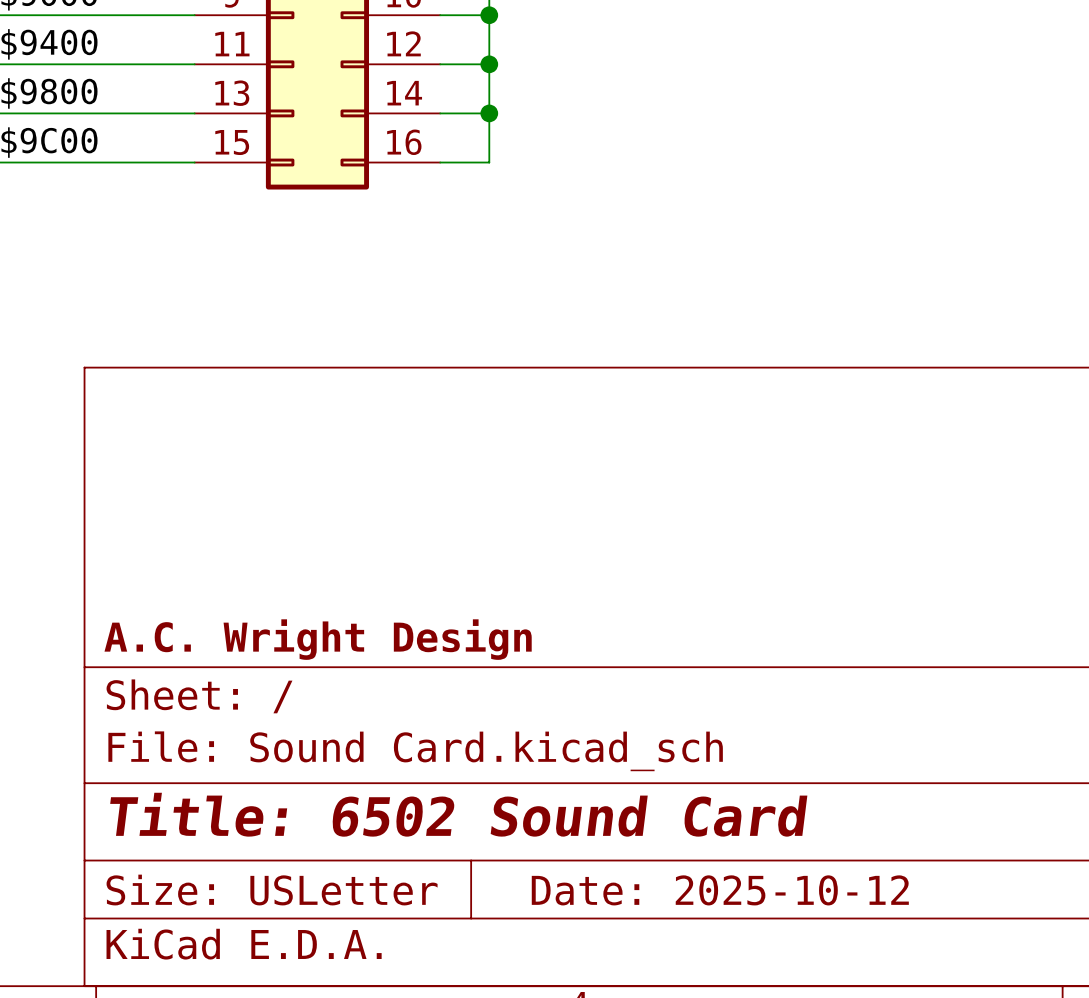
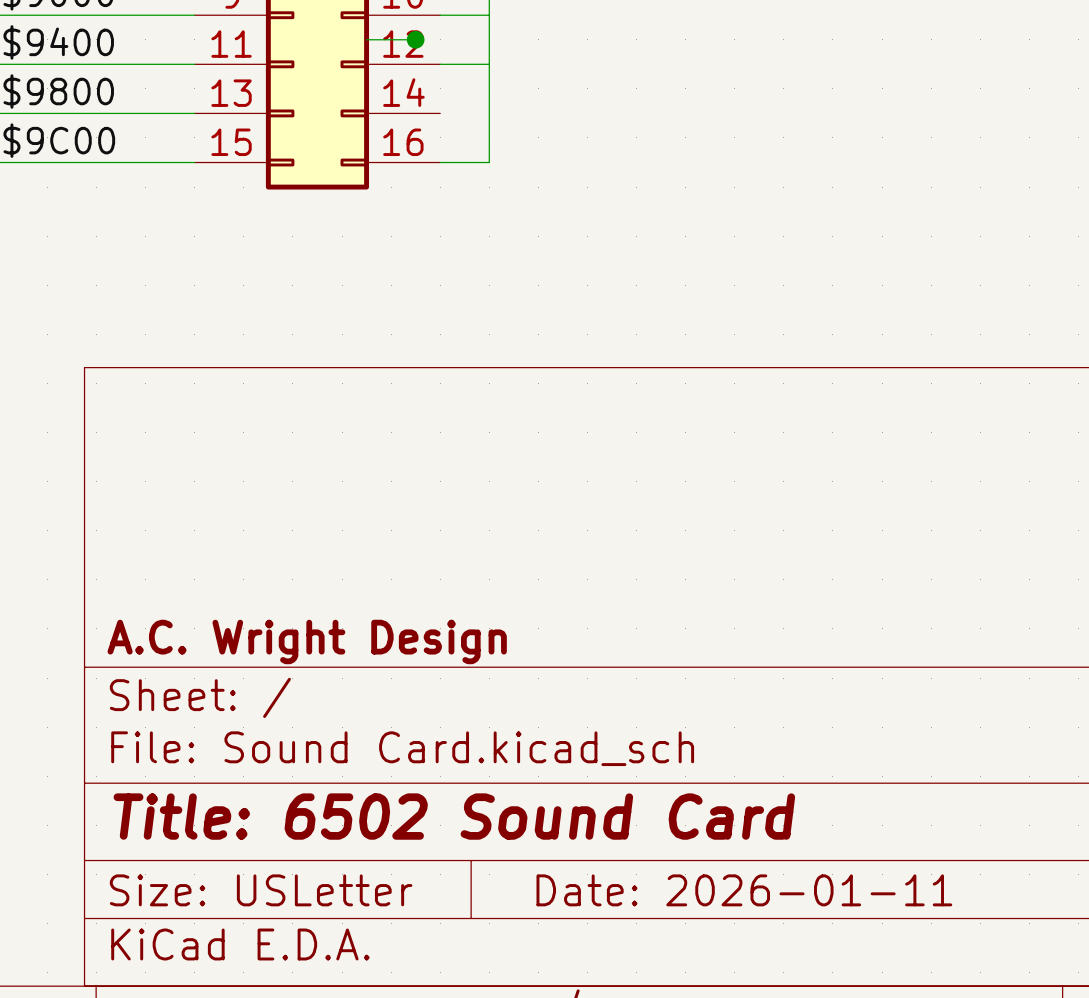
junction: (489, 15) -> none
junction: none -> (415, 39)
junction: (489, 64) -> none
wire: (440, 113) (489, 113) -> (366, 39) (415, 39)
junction: (489, 113) -> none
title block: Date: 2025-10-12 (720, 890) -> Date: 2026-01-11 (744, 890)

